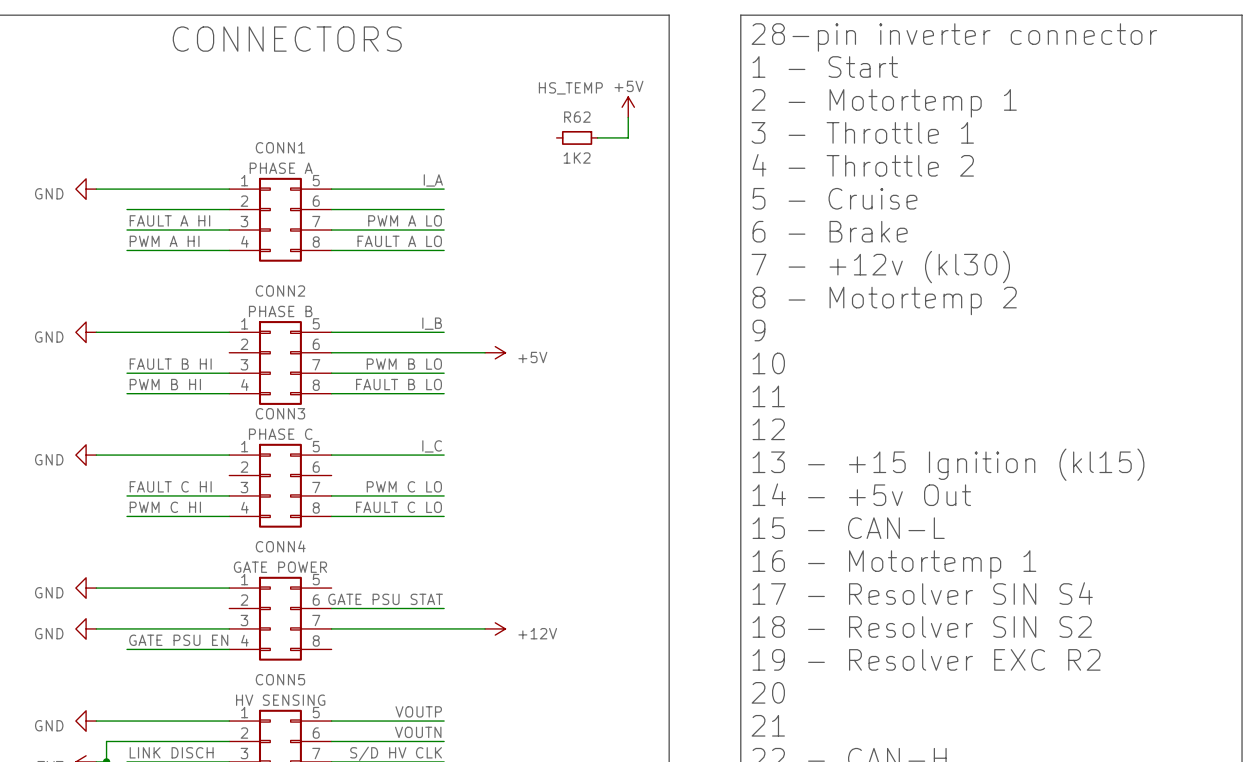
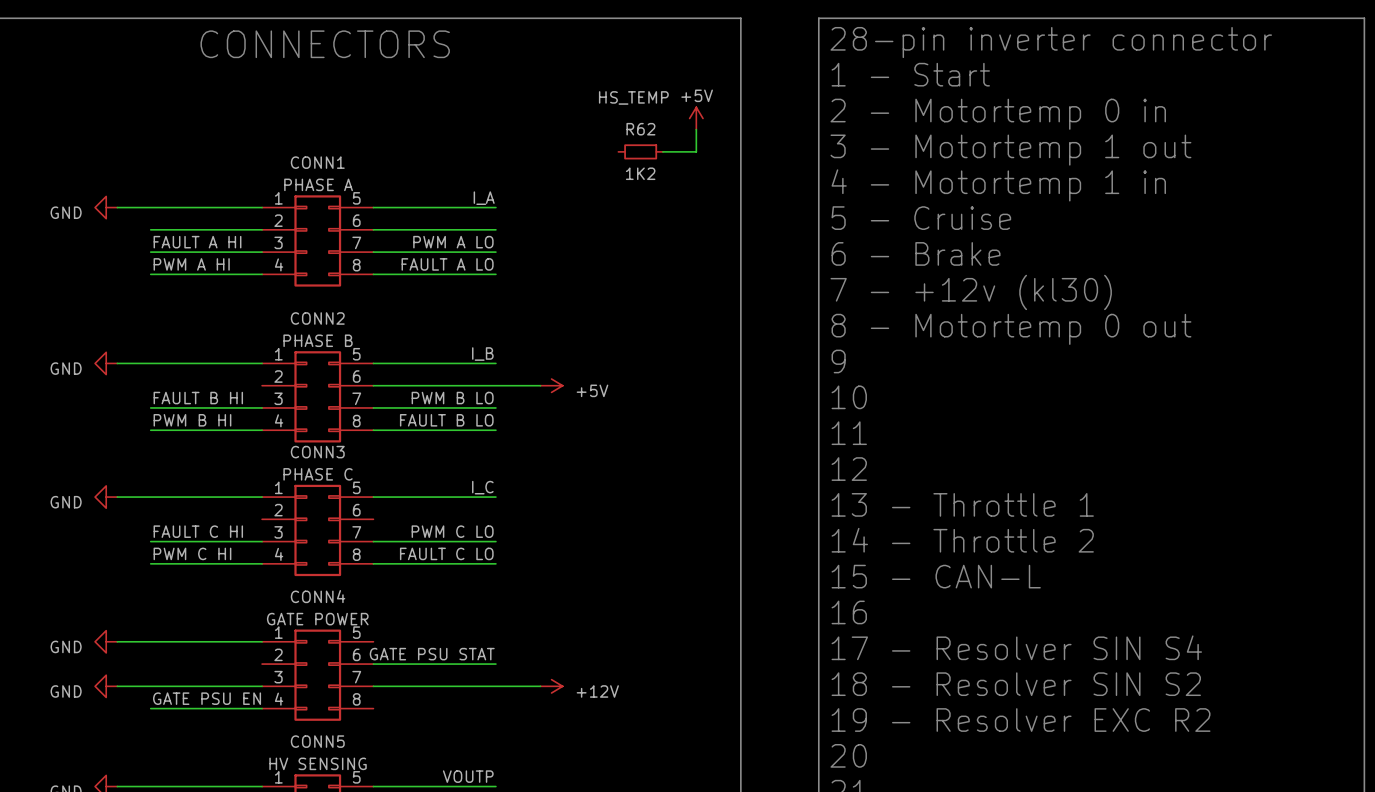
text: 2 - Motortemp 1 (884, 103) -> 2 - Motortemp 0 in (998, 114)
text: 3 - Throttle 1 (862, 132) -> 3 - Motortemp 1 out (1010, 150)
text: 4 - Throttle 2 (863, 165) -> 4 - Motortemp 1 in (998, 185)
text: 8 - Motortemp 2 (884, 300) -> 8 - Motortemp 0 out (1011, 329)
text: 13 - +15 Ignition (kl15) (948, 464) -> 13 - Throttle 1 (962, 504)
text: 14 - +5v Out (861, 494) -> 14 - Throttle 2 (962, 540)
text: 16 - Motortemp 1 (894, 564) -> 16 (849, 612)

